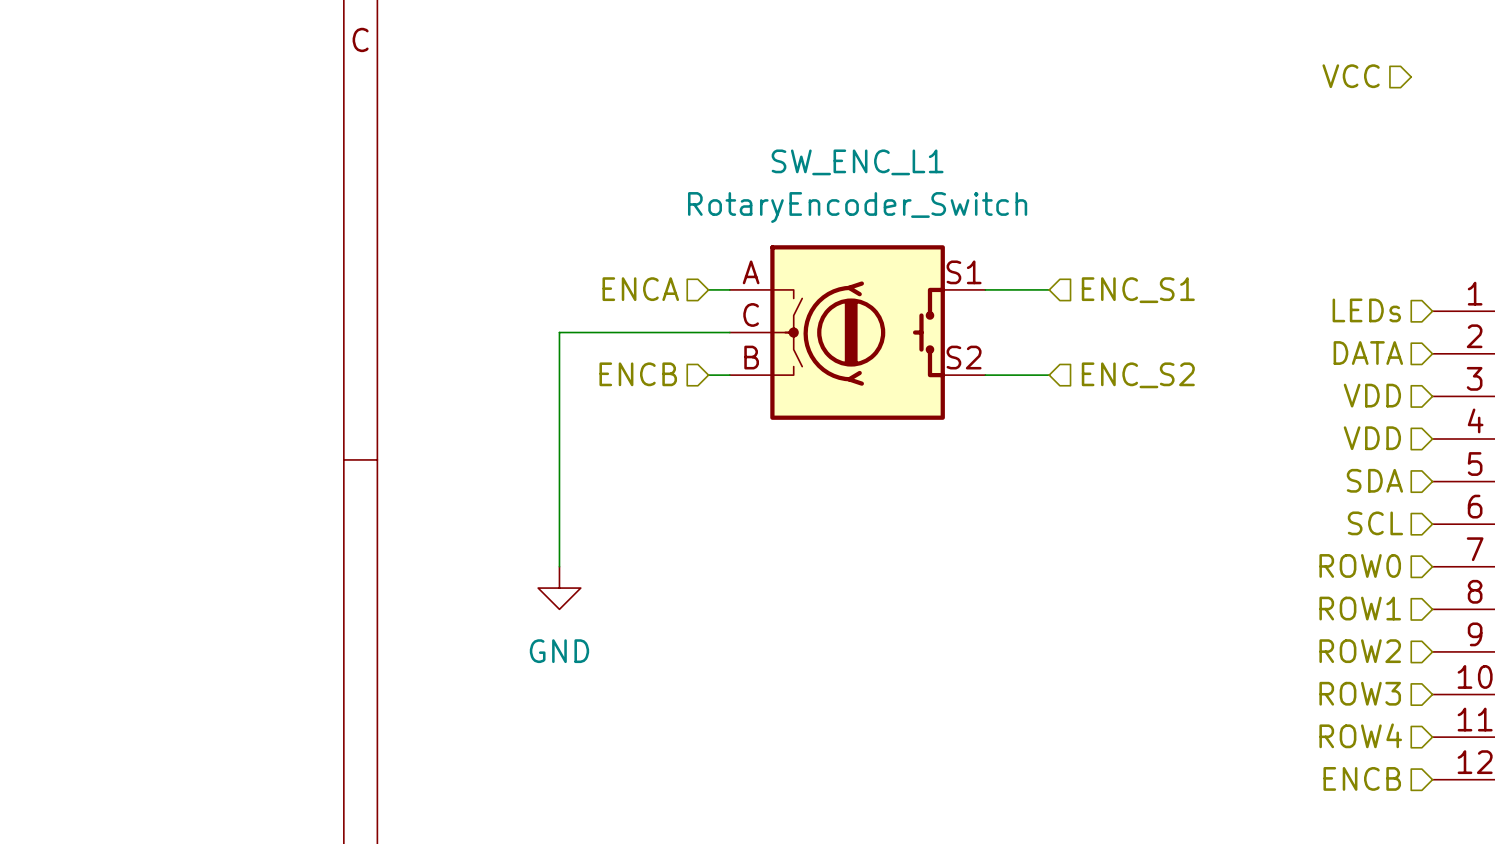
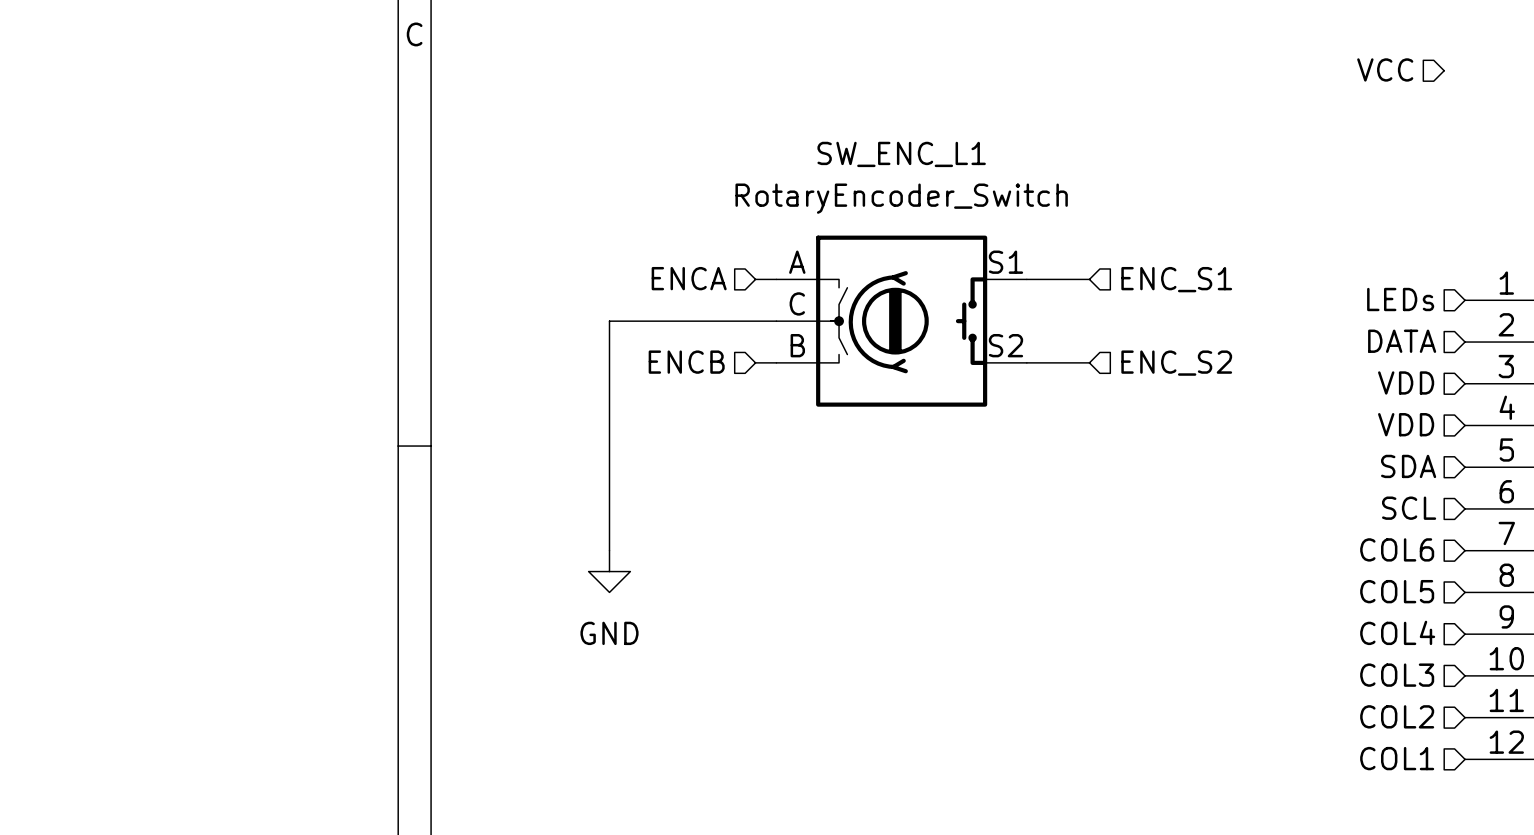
hierarchical label: ROW0 (1360, 565) -> COL6 (1397, 549)
hierarchical label: ROW1 (1360, 608) -> COL5 (1397, 591)
hierarchical label: ROW2 (1360, 651) -> COL4 (1397, 632)
hierarchical label: ROW3 (1360, 693) -> COL3 (1397, 675)
hierarchical label: ROW4 (1360, 735) -> COL2 (1397, 716)
hierarchical label: ENCB (1362, 778) -> COL1 (1397, 758)

